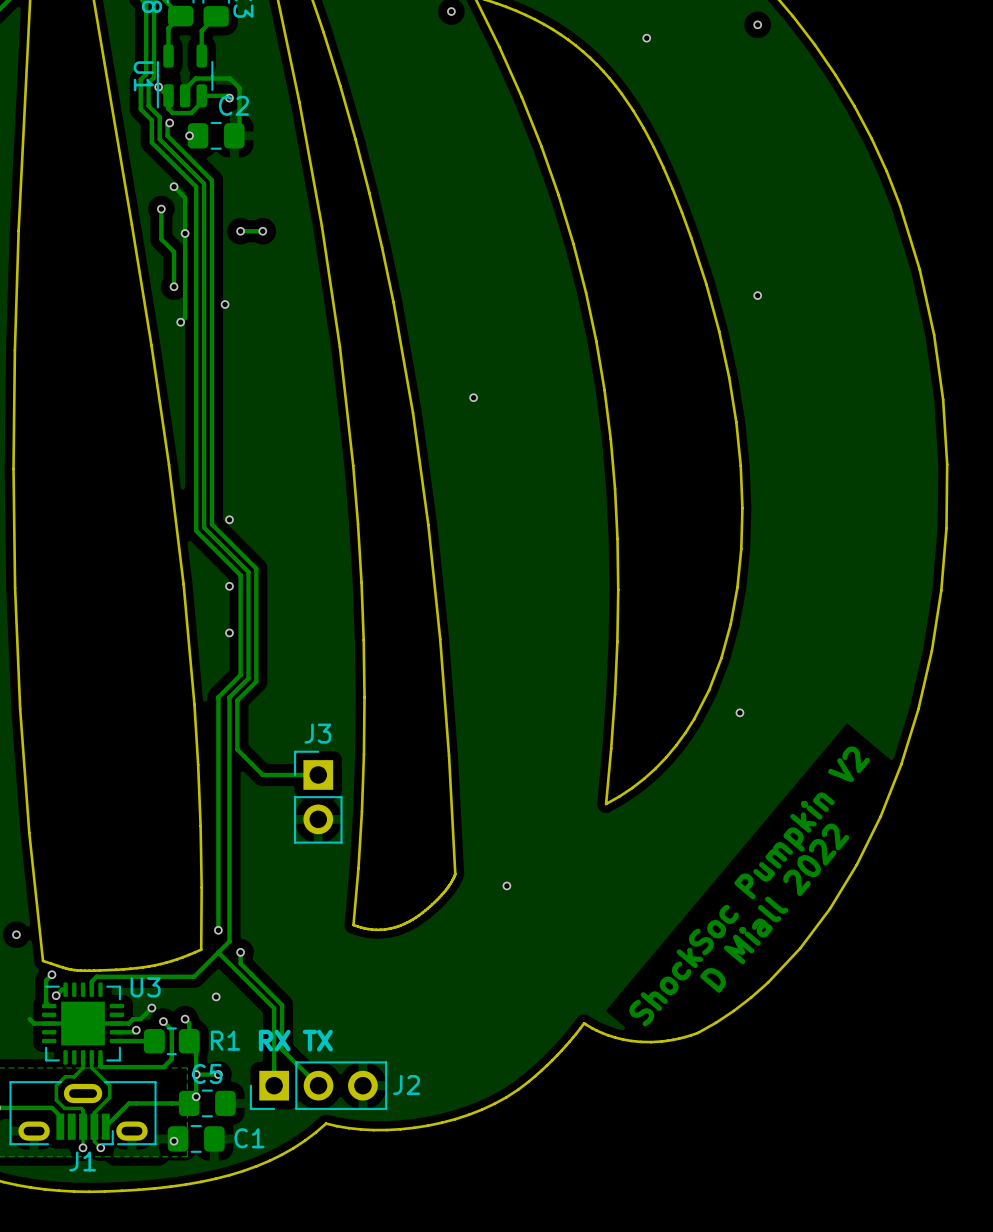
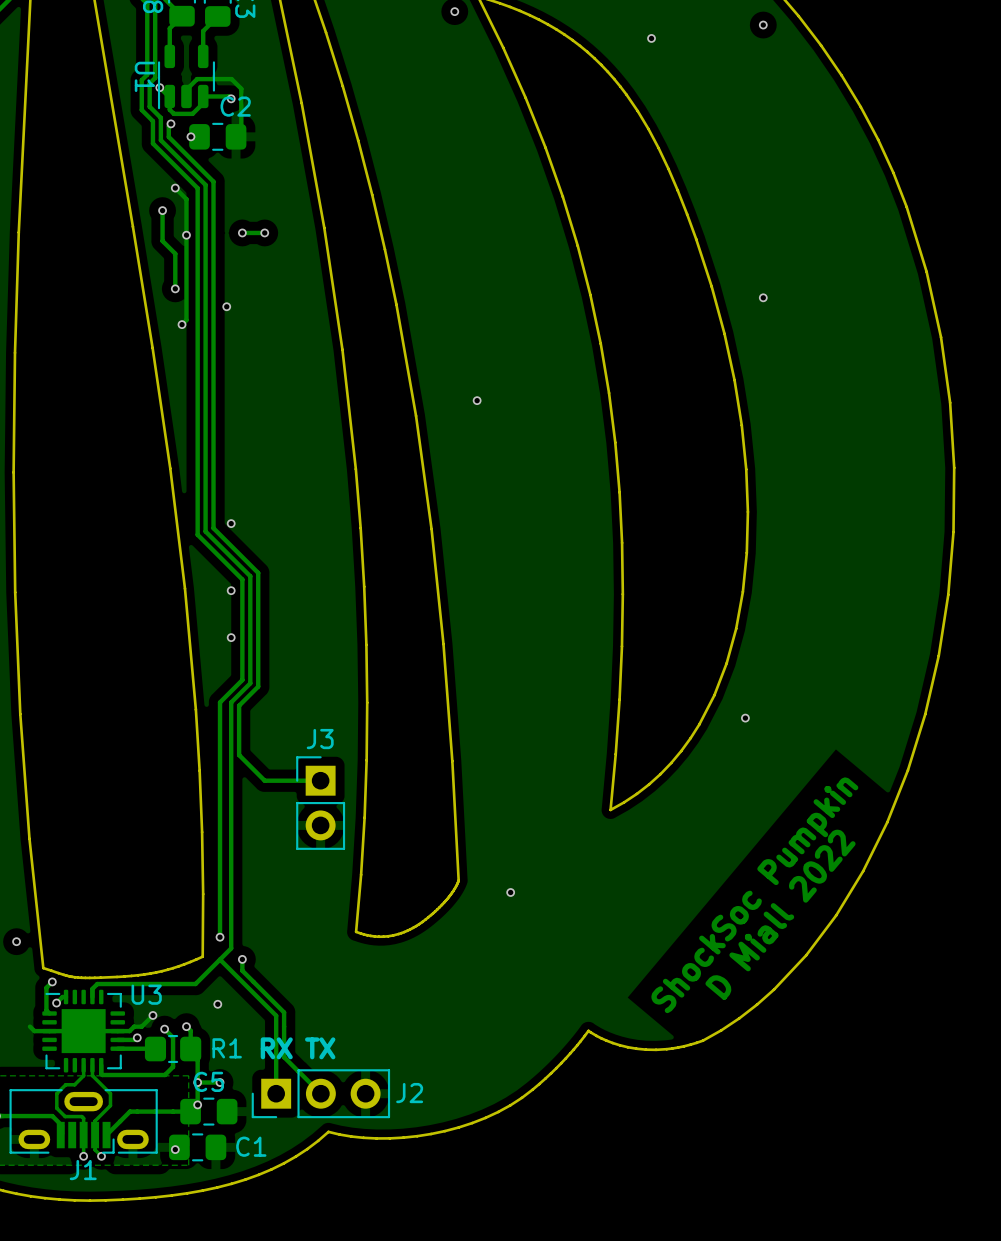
text: ShockSoc Pumpkin V2 (749, 886) -> ShockSoc Pumpkin (754, 895)

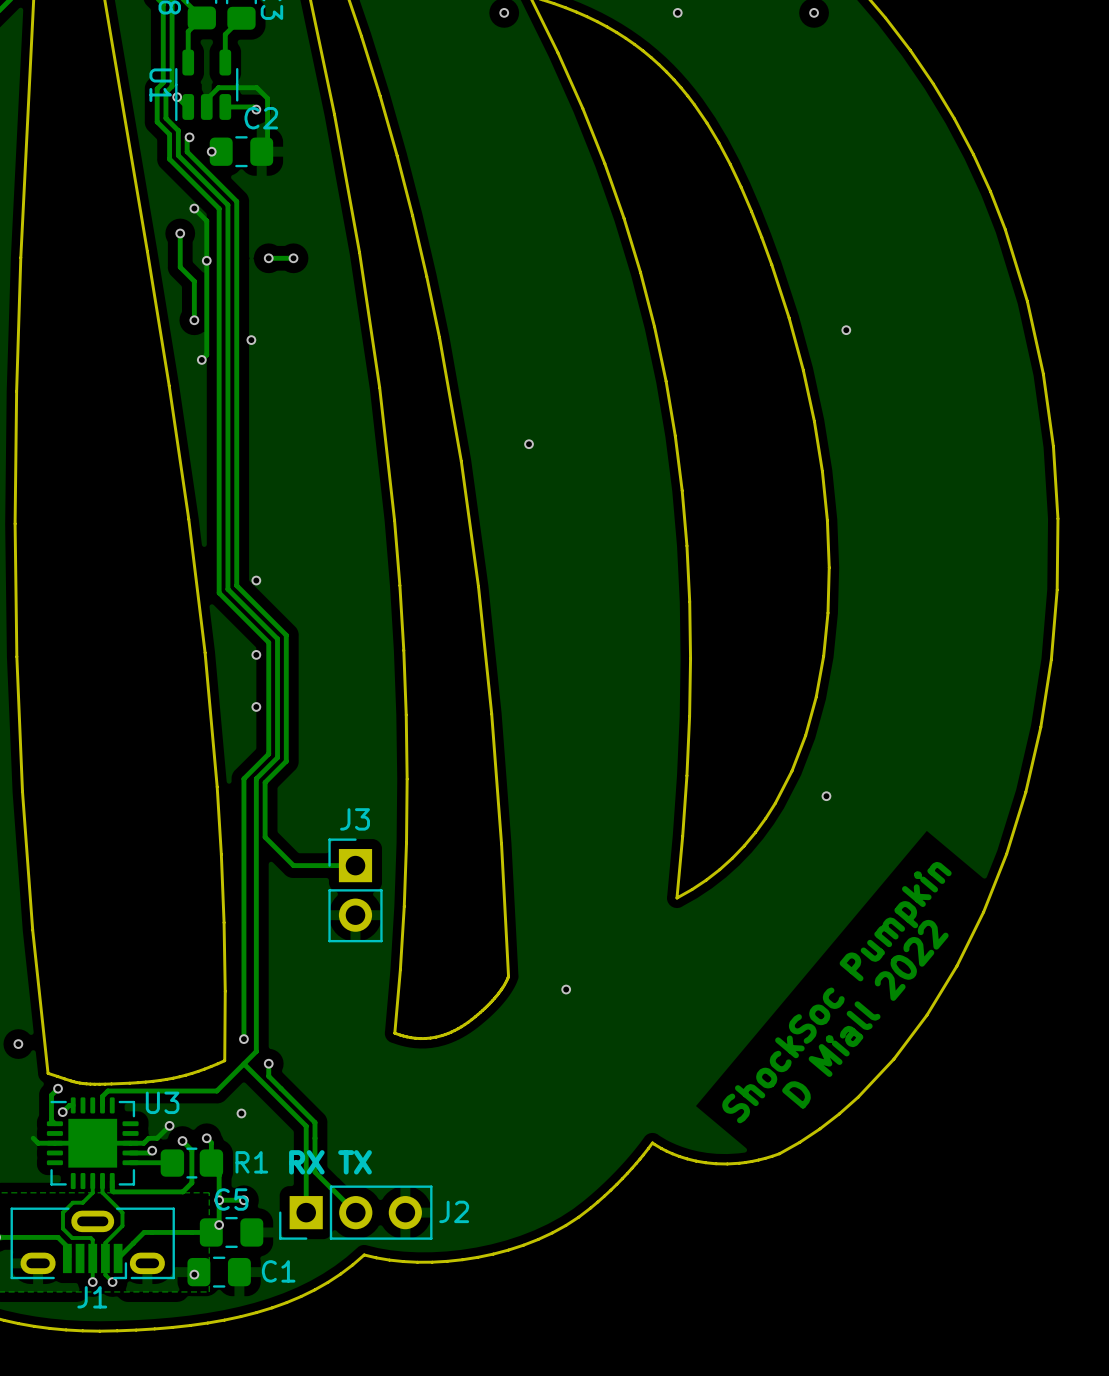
via: none -> (677, 12)
via position: (763, 25) -> (814, 12)
via: (651, 38) -> none
track: (203, 96) (203, 103) (192, 113) (173, 113) (169, 109) (169, 96) -> none

